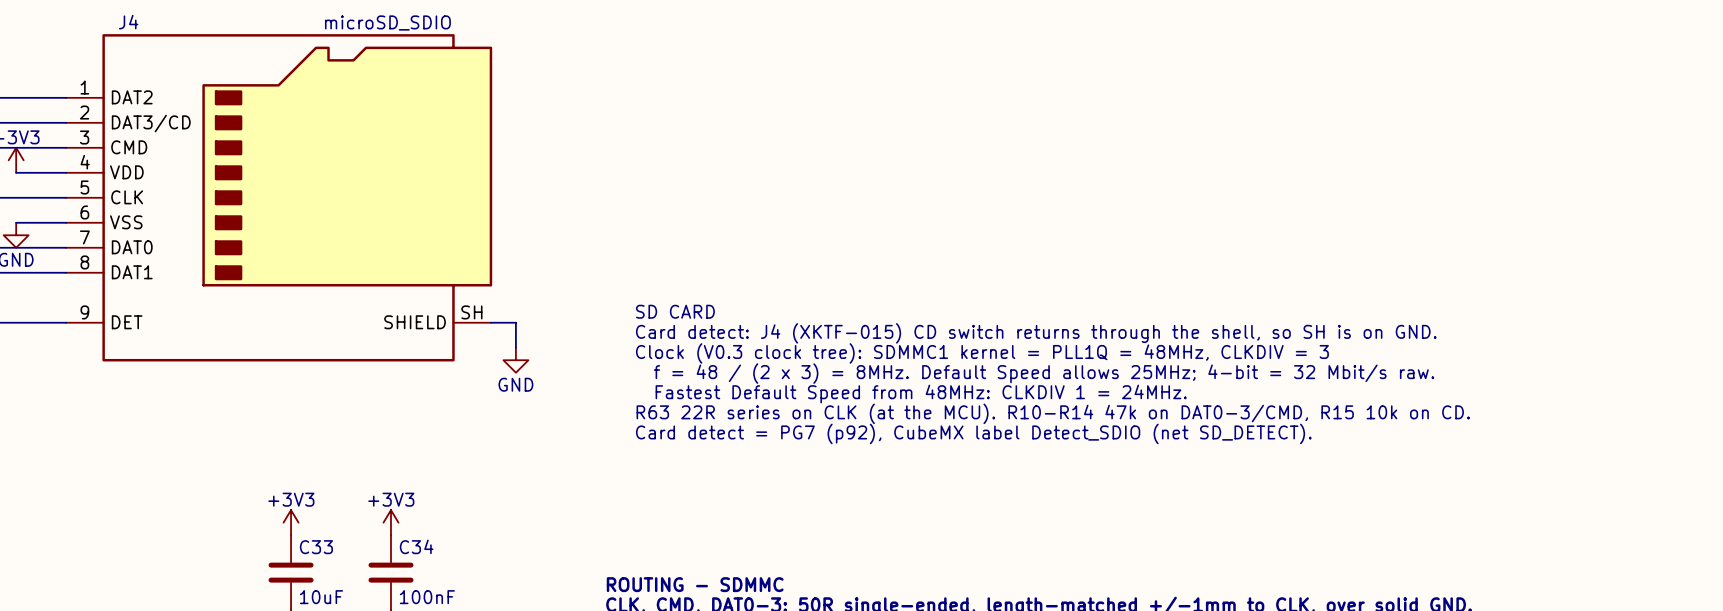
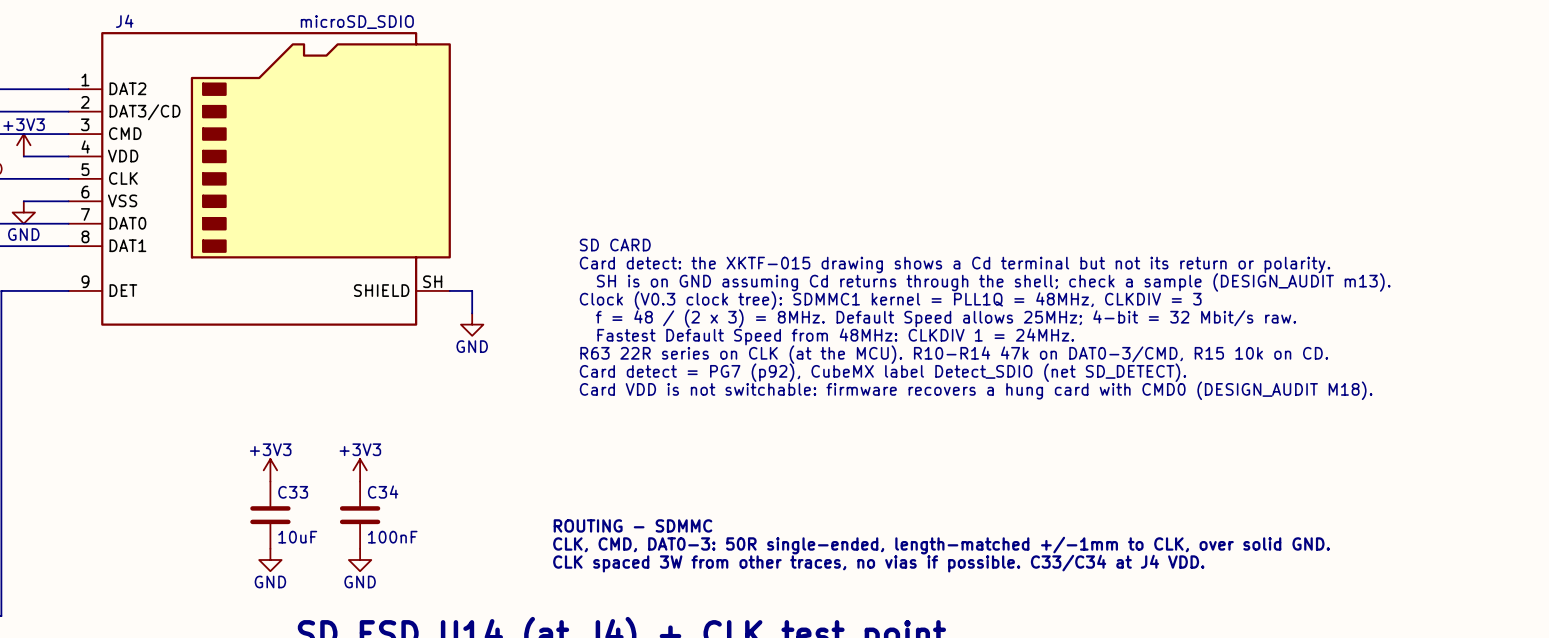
text: none -> SD CARD (615, 245)
text: none -> Card detect: the XKTF-015 drawing shows a Cd terminal but not its return or polarity. (955, 264)
text: SD CARD (675, 311) -> SH is on GND assuming Cd returns through the shell; check a sample (DESIGN_AUDIT m13). (993, 282)
text: Card detect: J4 (XKTF-015) CD switch returns through the shell, so SH is on GND. (1036, 333) -> Clock (V0.3 clock tree): SDMMC1 kernel = PLL1Q = 48MHz, CLKDIV = 3 (890, 300)
text: Clock (V0.3 clock tree): SDMMC1 kernel = PLL1Q = 48MHz, CLKDIV = 3 (982, 353) -> f = 48 / (2 x 3) = 8MHz. Default Speed allows 25MHz; 4-bit = 32 Mbit/s raw. (945, 318)
text: f = 48 / (2 x 3) = 8MHz. Default Speed allows 25MHz; 4-bit = 32 Mbit/s raw. (1044, 373) -> Fastest Default Speed from 48MHz: CLKDIV 1 = 24MHz. (835, 336)
text: Fastest Default Speed from 48MHz: CLKDIV 1 = 24MHz. (921, 394) -> R63 22R series on CLK (at the MCU). R10-R14 47k on DAT0-3/CMD, R15 10k on CD. (954, 354)
text: R63 22R series on CLK (at the MCU). R10-R14 47k on DAT0-3/CMD, R15 10k on CD. (1053, 413) -> Card detect = PG7 (p92), CubeMX label Detect_SDIO (net SD_DETECT). (882, 372)
text: Card detect = PG7 (p92), CubeMX label Detect_SDIO (net SD_DETECT). (973, 433) -> Card VDD is not switchable: firmware recovers a hung card with CMD0 (DESIGN_AUDIT M18). (976, 390)

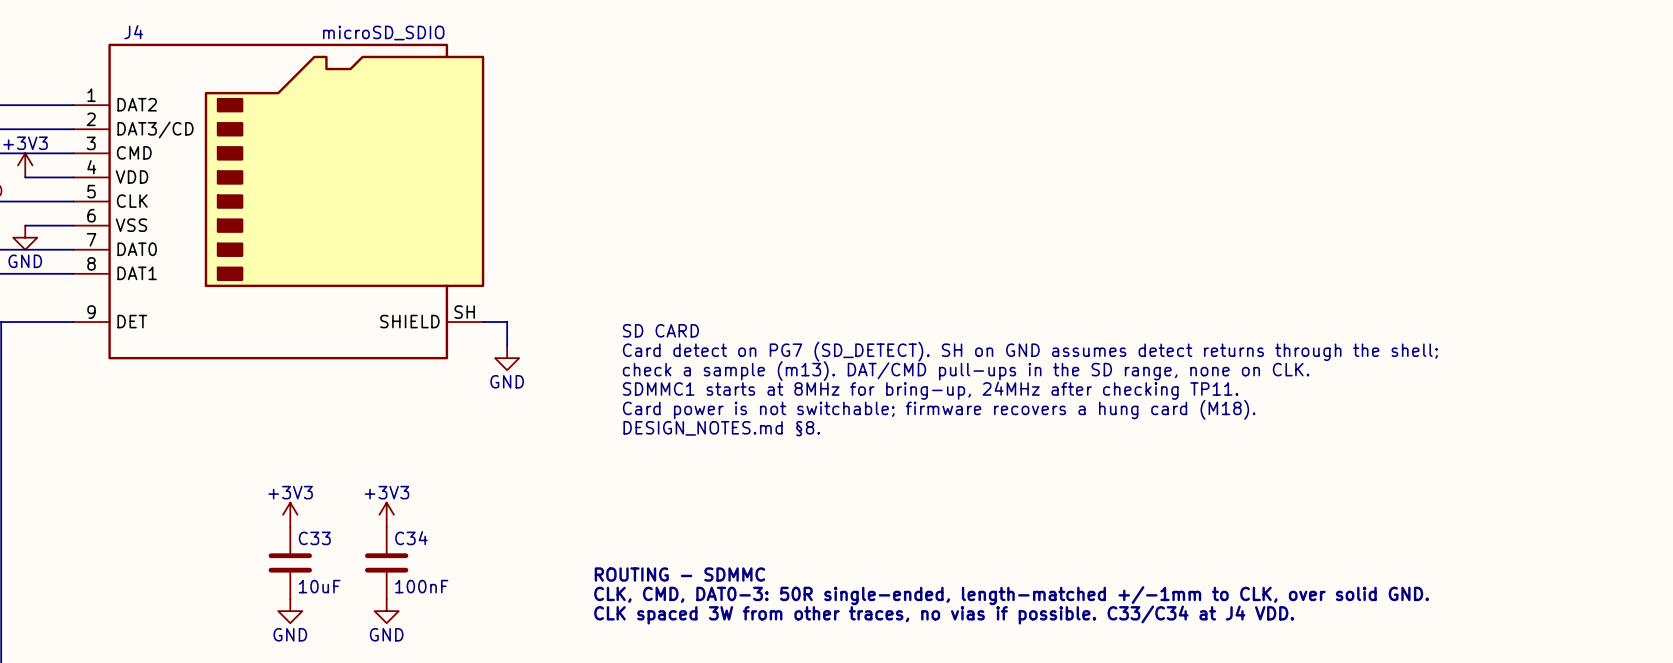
text: SD CARD (615, 245) -> none
text: Card detect: the XKTF-015 drawing shows a Cd terminal but not its return or polarity. (955, 264) -> none
text: SH is on GND assuming Cd returns through the shell; check a sample (DESIGN_AUDIT m13). (993, 282) -> none
text: Clock (V0.3 clock tree): SDMMC1 kernel = PLL1Q = 48MHz, CLKDIV = 3 (890, 300) -> SD CARD (660, 330)
text: f = 48 / (2 x 3) = 8MHz. Default Speed allows 25MHz; 4-bit = 32 Mbit/s raw. (945, 318) -> Card detect on PG7 (SD_DETECT). SH on GND assumes detect returns through the shell; (1030, 351)
text: Fastest Default Speed from 48MHz: CLKDIV 1 = 24MHz. (835, 336) -> check a sample (m13). DAT/CMD pull-ups in the SD range, none on CLK. (966, 371)
text: R63 22R series on CLK (at the MCU). R10-R14 47k on DAT0-3/CMD, R15 10k on CD. (954, 354) -> SDMMC1 starts at 8MHz for bring-up, 24MHz after checking TP11. (930, 390)
text: Card detect = PG7 (p92), CubeMX label Detect_SDIO (net SD_DETECT). (882, 372) -> Card power is not switchable; firmware recovers a hung card (M18). (939, 409)
text: Card VDD is not switchable: firmware recovers a hung card with CMD0 (DESIGN_AUDIT M18). (976, 390) -> DESIGN_NOTES.md §8. (721, 428)

